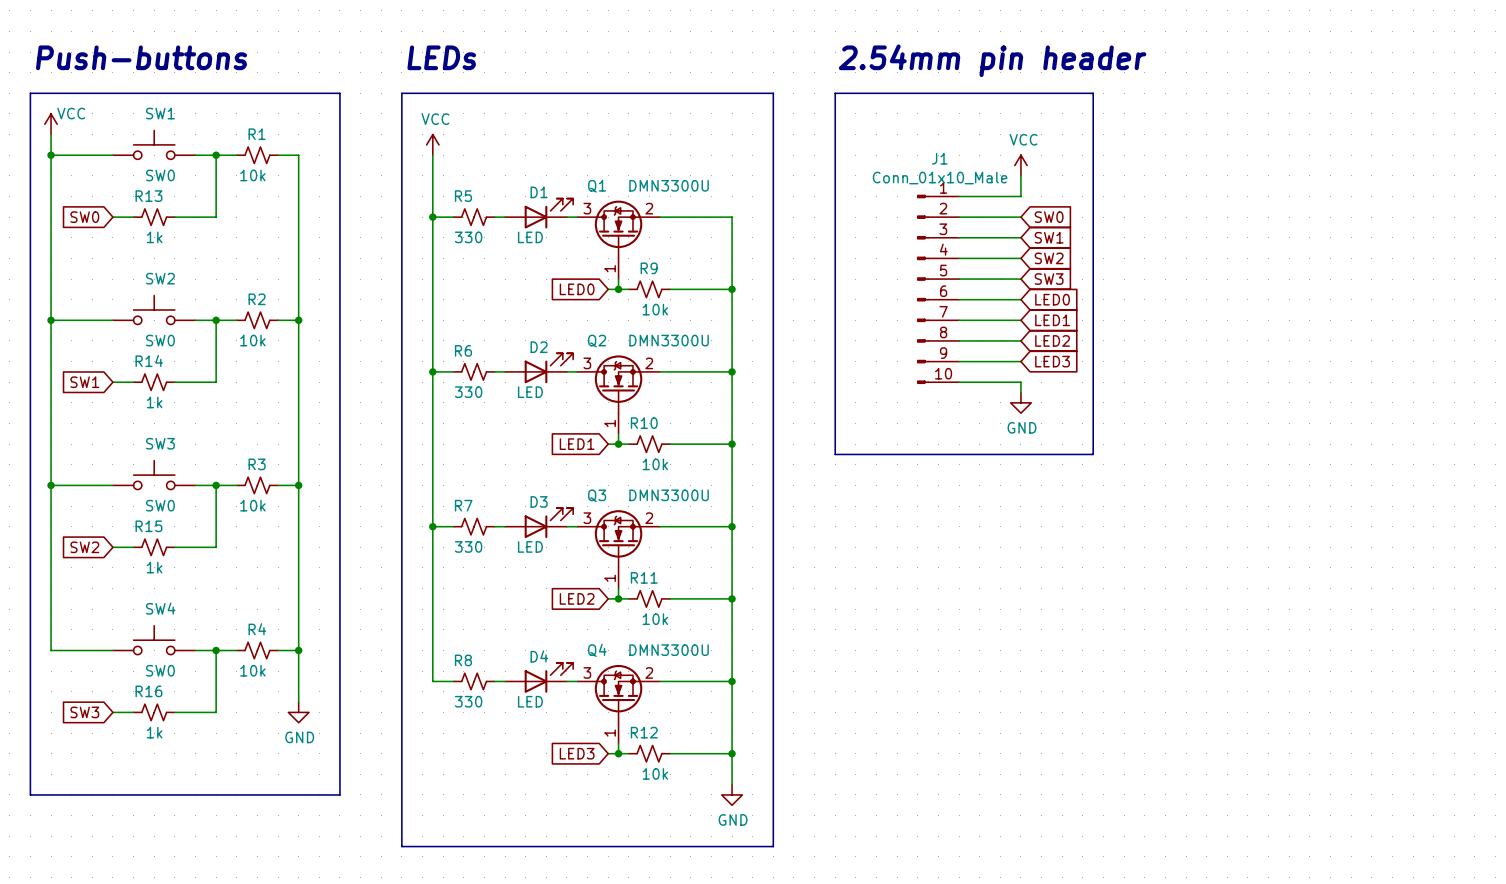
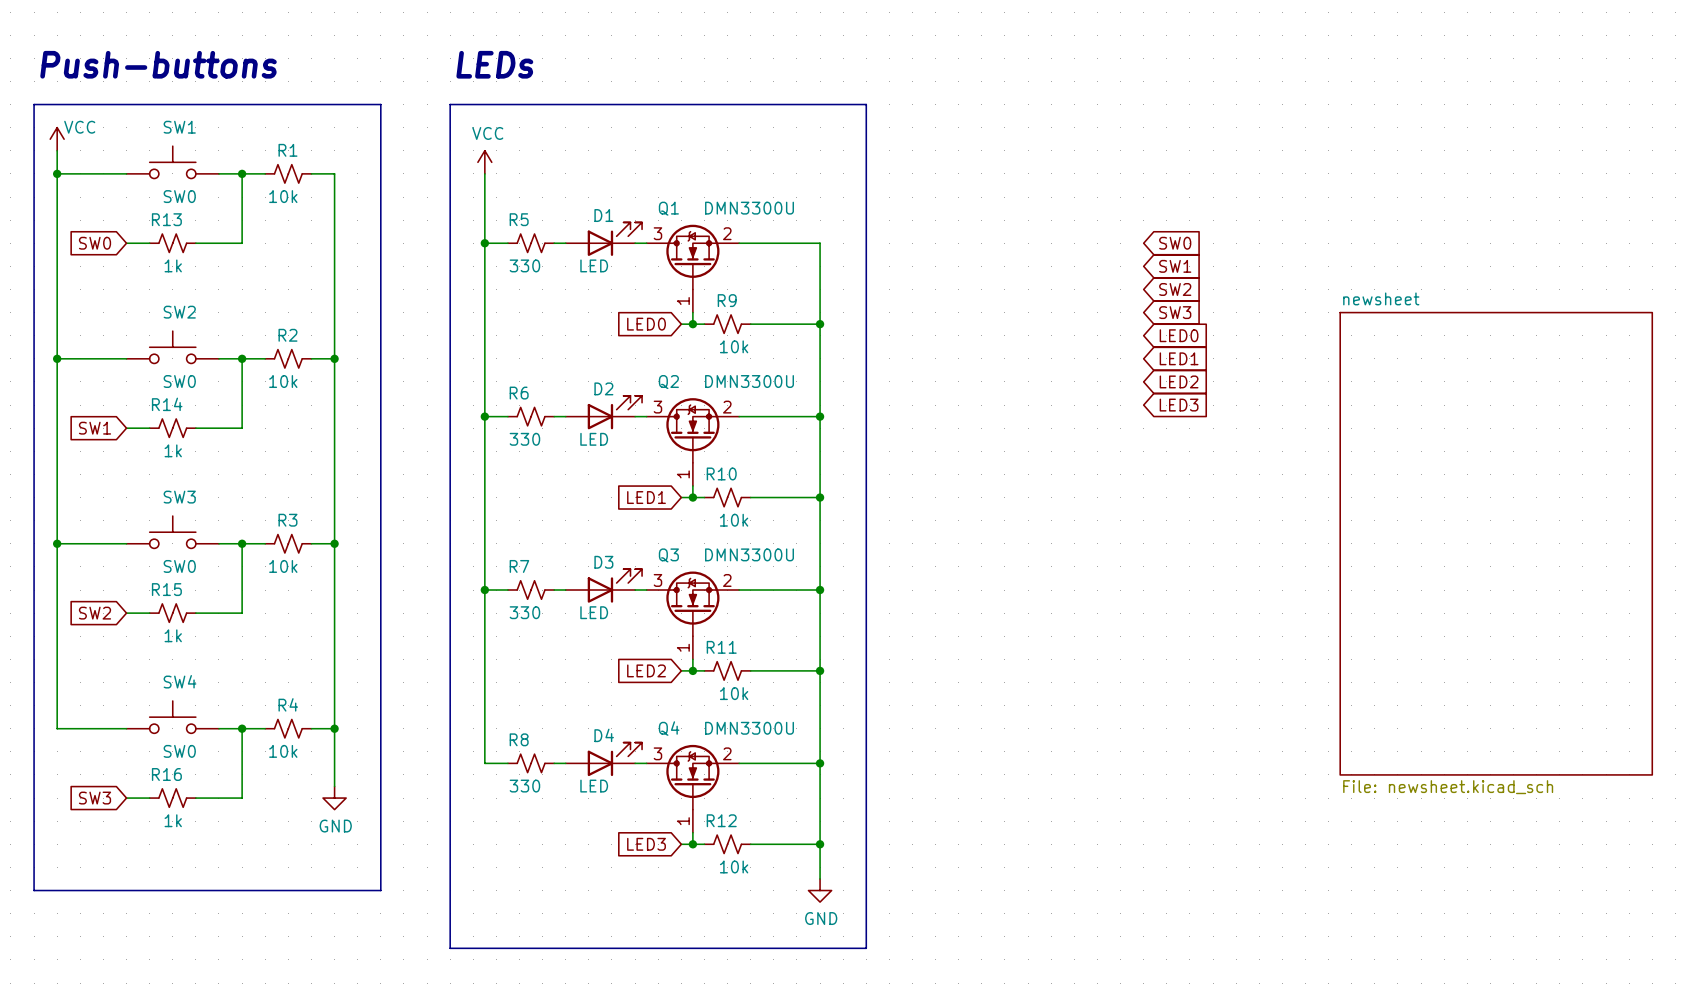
text: 2.54mm pin header (992, 60) -> none
line: (835, 93) (1093, 93) (1093, 454) (835, 454) (835, 93) -> none
power symbol: VCC (1020, 165) -> none
wire: (1020, 175) (1020, 196) (959, 196) -> none
wire: (959, 217) (1020, 217) -> none
wire: (959, 237) (1020, 237) -> none
wire: (959, 258) (1020, 258) -> none
wire: (959, 279) (1020, 279) -> none
J1: Conn_01x10_Male (938, 289) -> none
wire: (959, 299) (1020, 299) -> none
wire: (959, 320) (1020, 320) -> none
wire: (959, 340) (1020, 340) -> none
wire: (959, 361) (1020, 361) -> none
wire: (959, 382) (1020, 382) (1020, 392) -> none
power symbol: GND (1020, 402) -> none
sheet newsheet: none -> File: newsheet.kicad_sch (1496, 543)

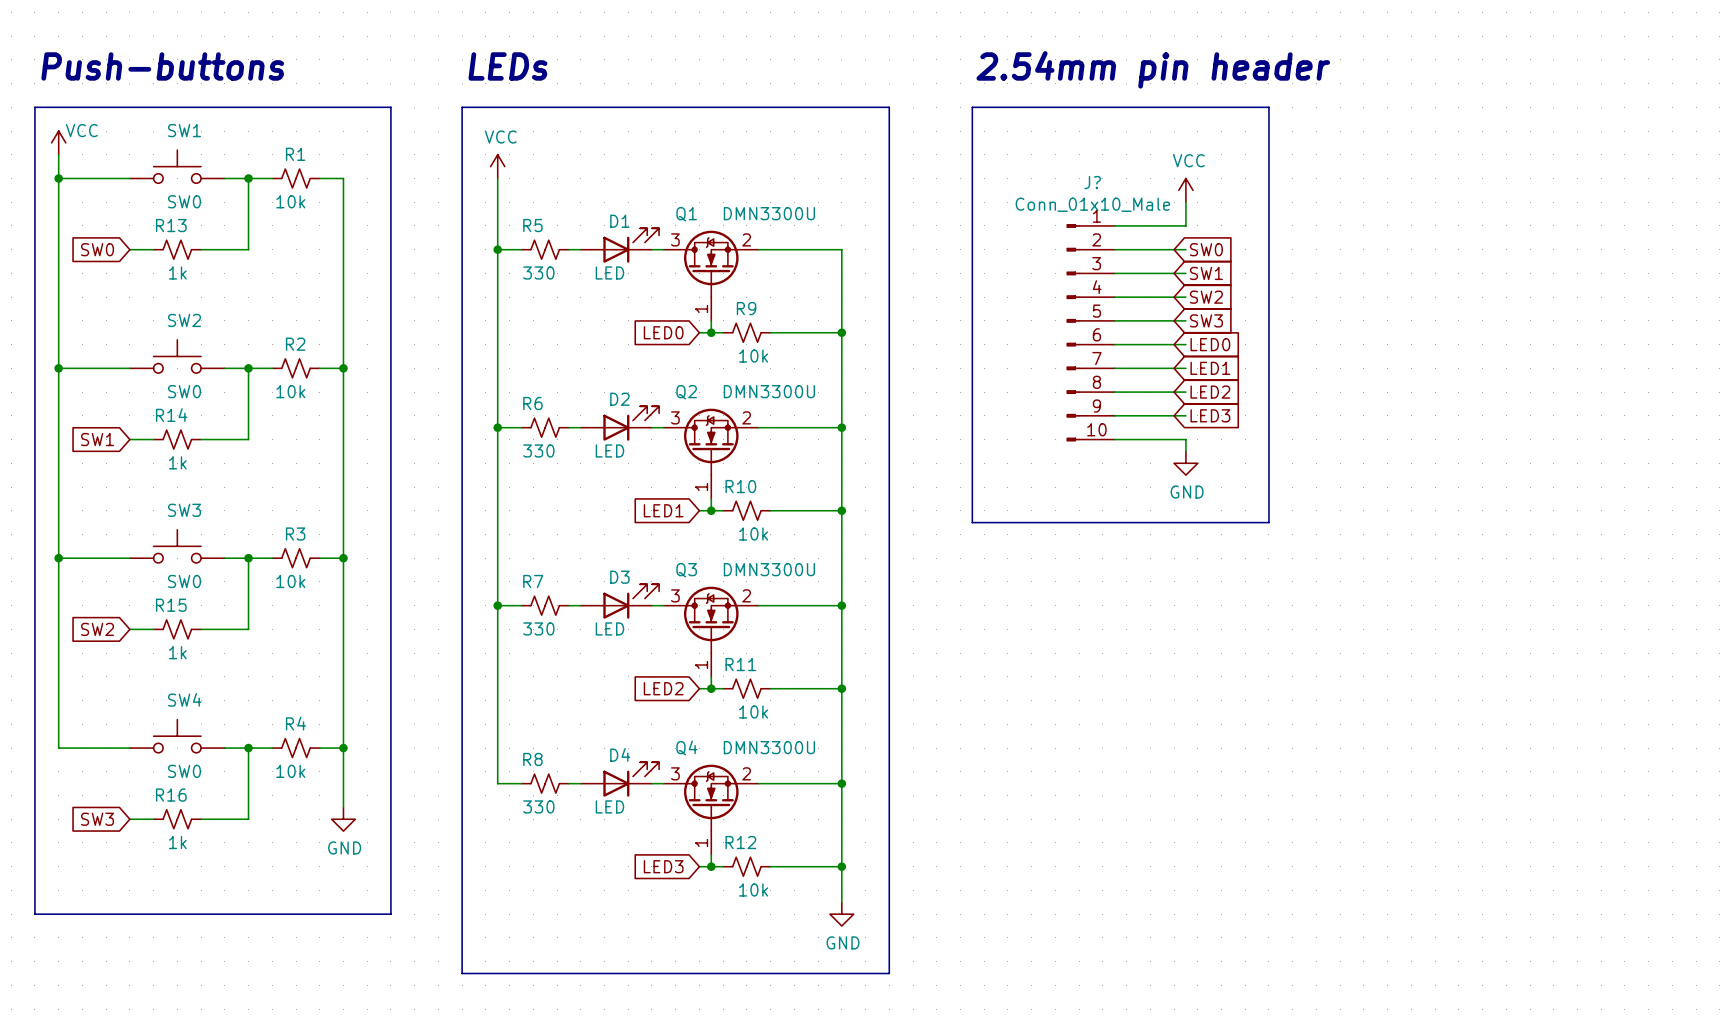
text: none -> 2.54mm pin header (1153, 69)
line: none -> (972, 107) (972, 522) (1268, 522) (1268, 107) (972, 107)
power symbol: none -> VCC (1185, 190)
wire: none -> (1185, 202) (1185, 225) (1114, 225)
wire: none -> (1114, 249) (1185, 249)
wire: none -> (1114, 273) (1185, 273)
wire: none -> (1114, 297) (1185, 297)
wire: none -> (1114, 320) (1185, 320)
J?: none -> Conn_01x10_Male (1090, 332)
wire: none -> (1114, 344) (1185, 344)
wire: none -> (1114, 368) (1185, 368)
wire: none -> (1114, 392) (1185, 392)
wire: none -> (1114, 415) (1185, 415)
wire: none -> (1114, 439) (1185, 439) (1185, 451)
power symbol: none -> GND (1185, 463)
sheet newsheet: File: newsheet.kicad_sch (1496, 543) -> none

